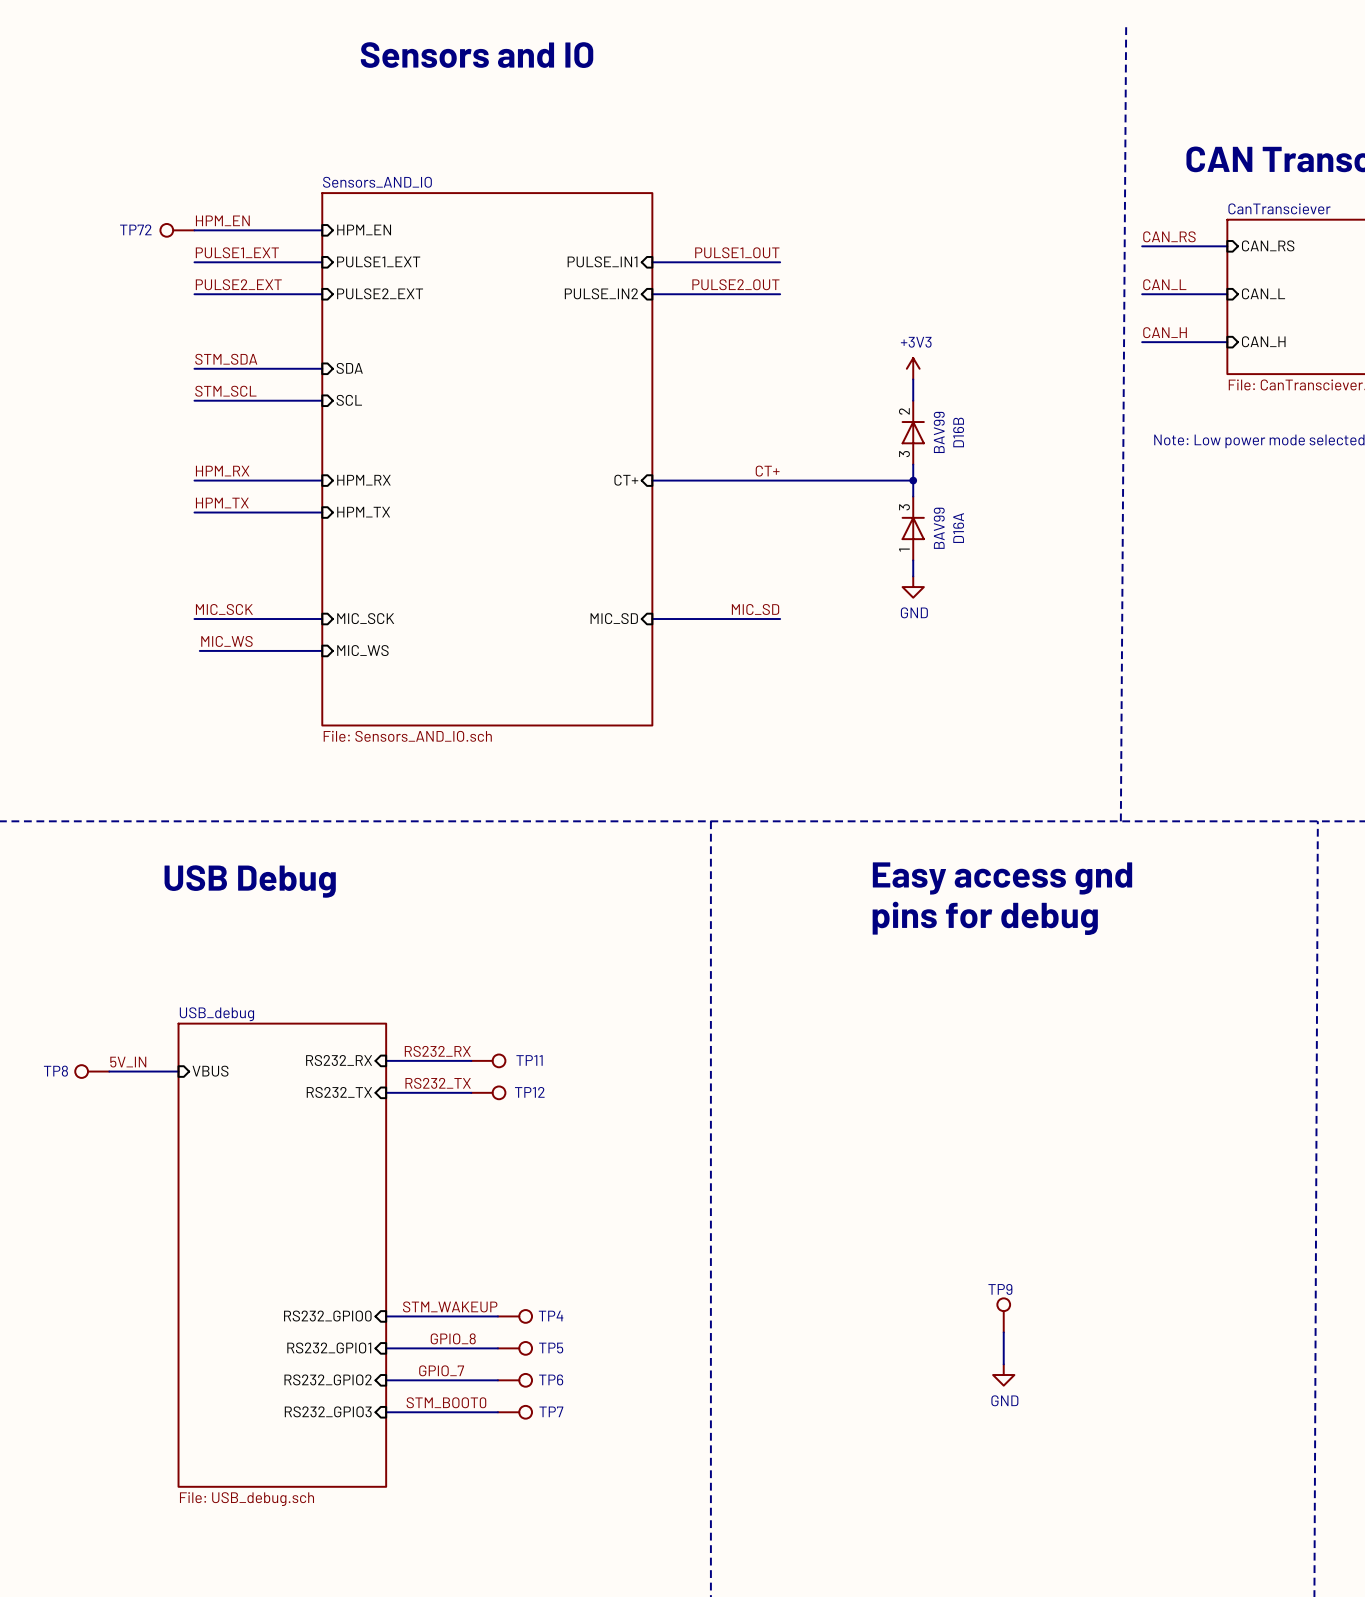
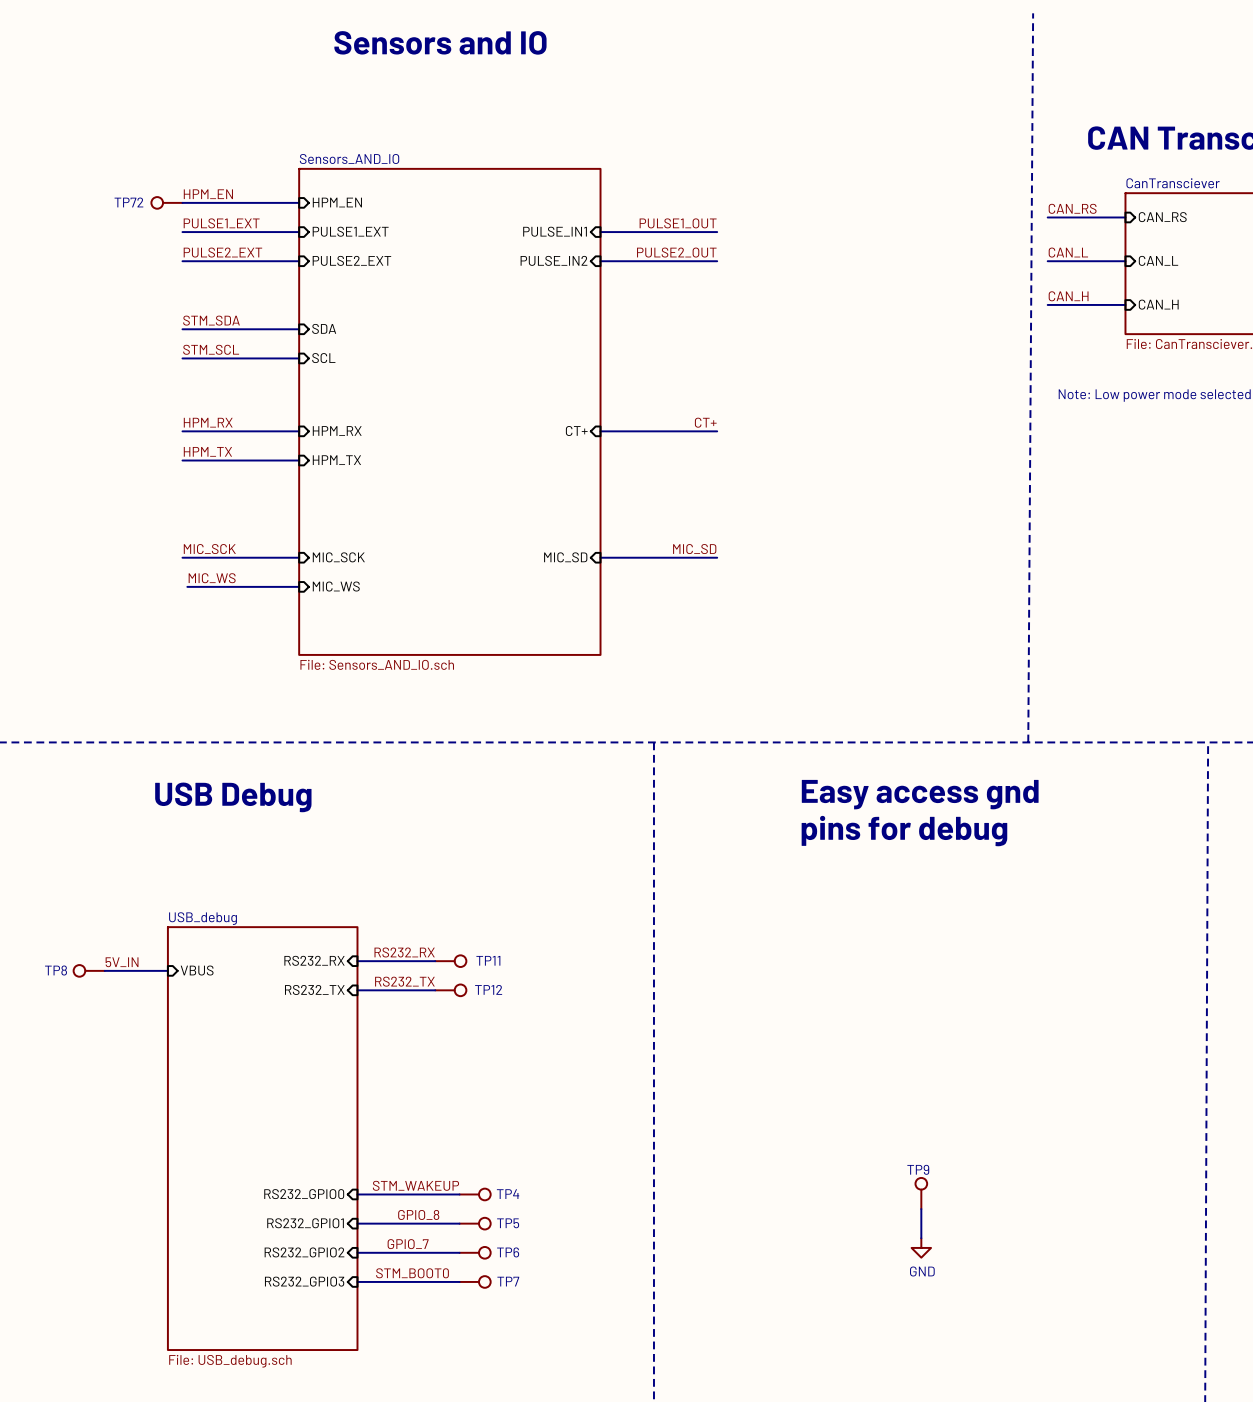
power symbol: +3V3 (913, 368) -> none
wire: (913, 379) (913, 400) -> none
D16B: BAV99 (913, 432) -> none
wire: (913, 464) (913, 496) -> none
wire: (780, 480) (913, 480) -> none
junction: (913, 480) -> none
D16A: BAV99 (913, 528) -> none
wire: (913, 560) (913, 576) -> none
power symbol: GND (913, 587) -> none

